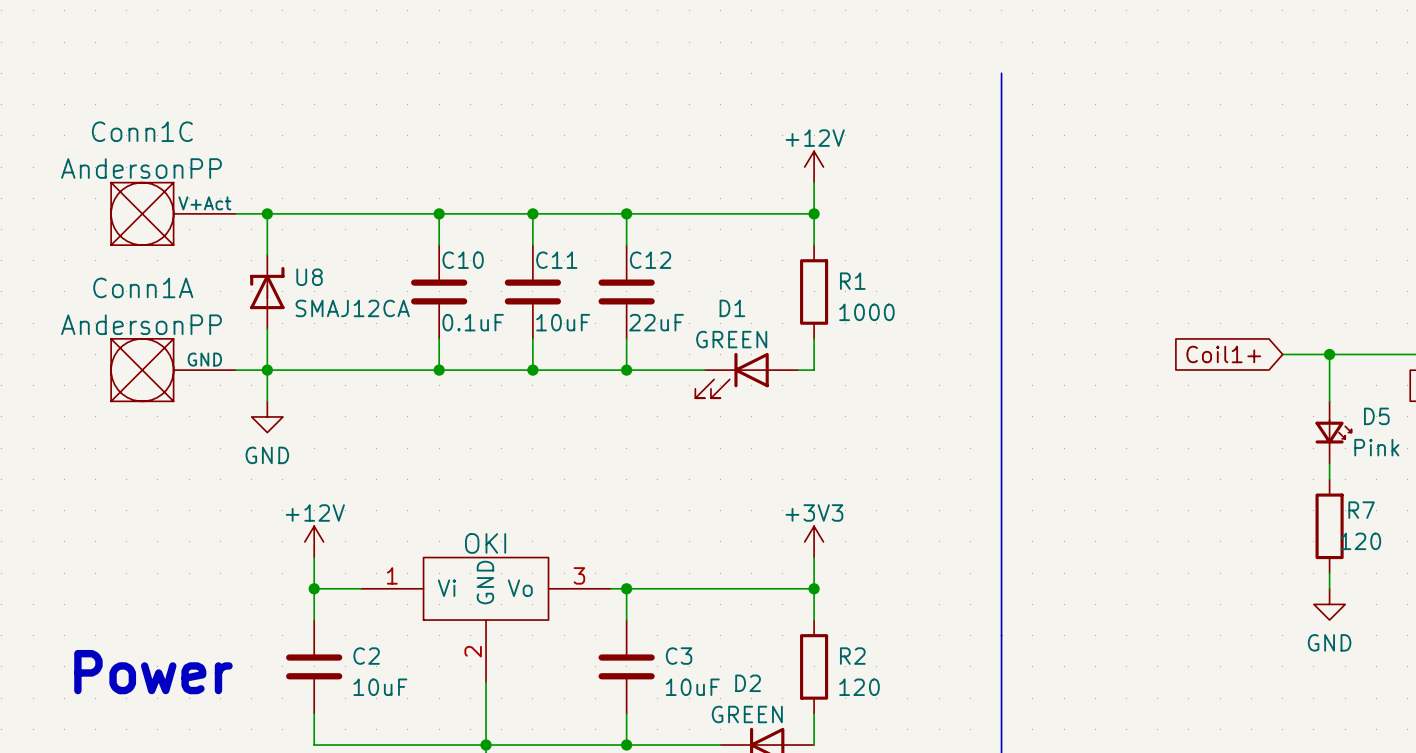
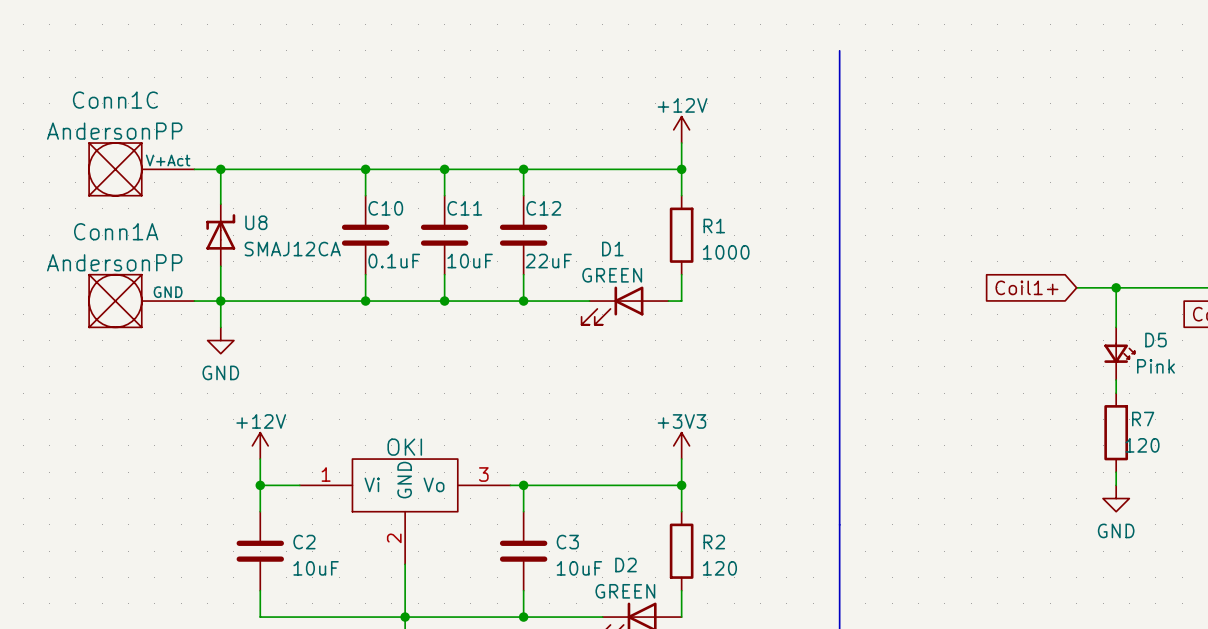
text: Power (153, 672) -> none

